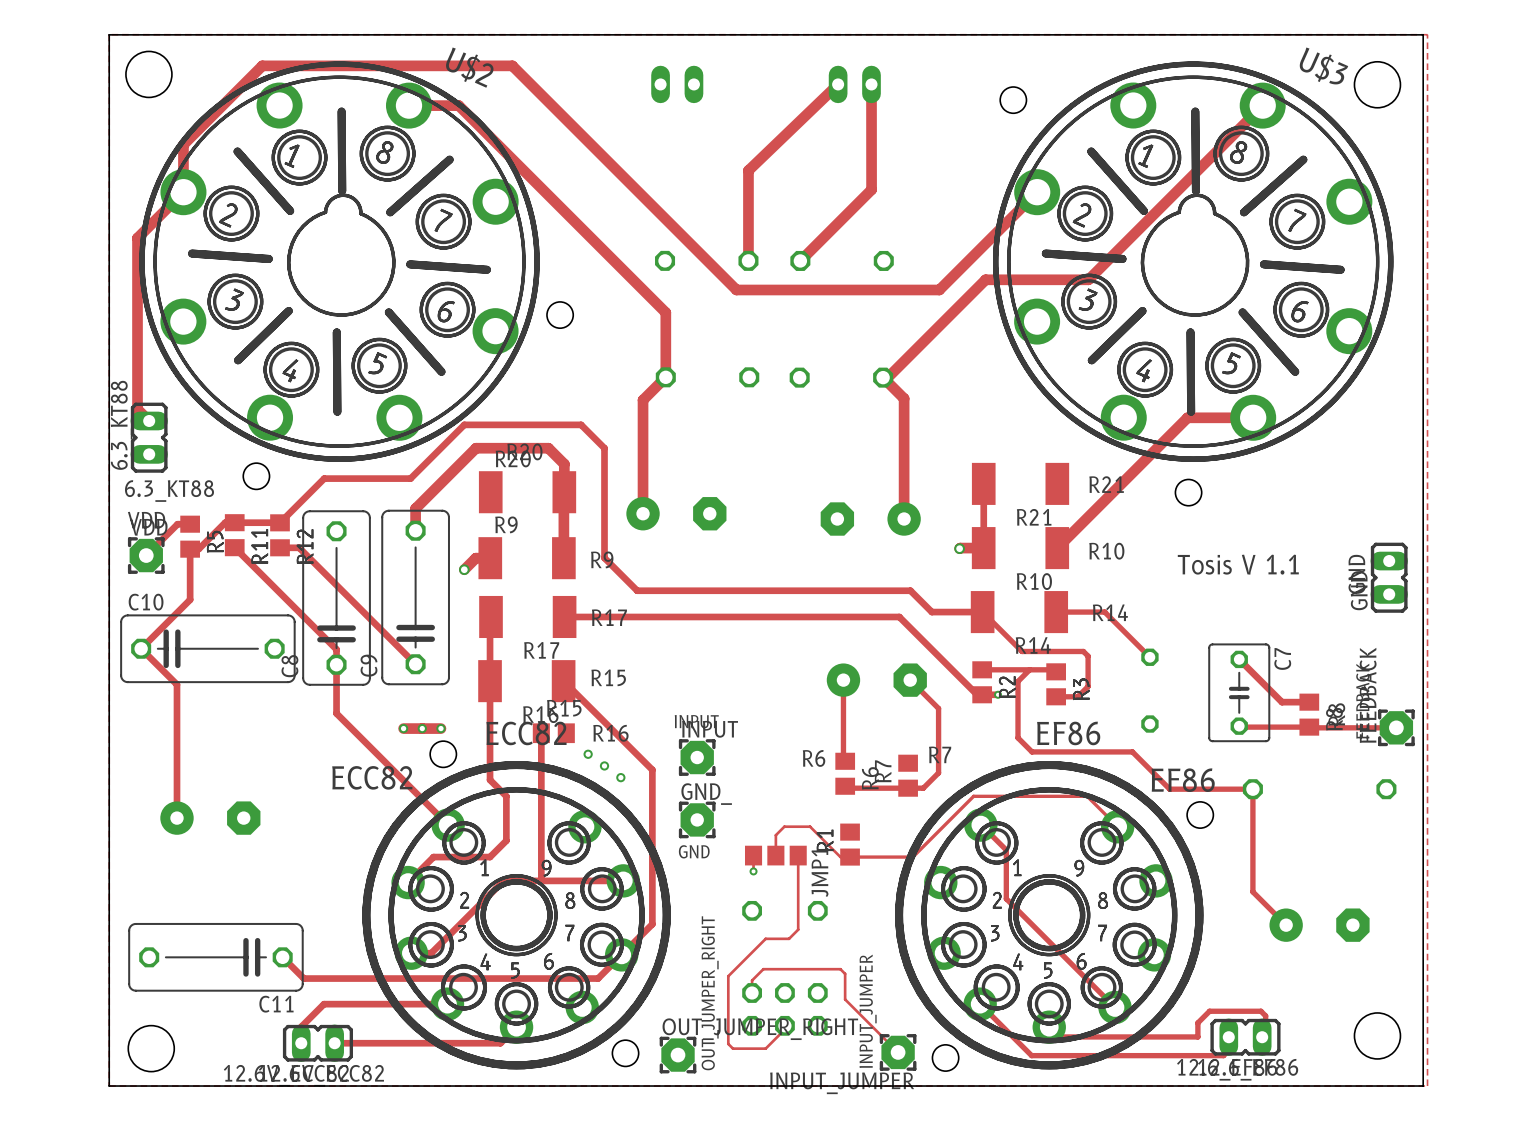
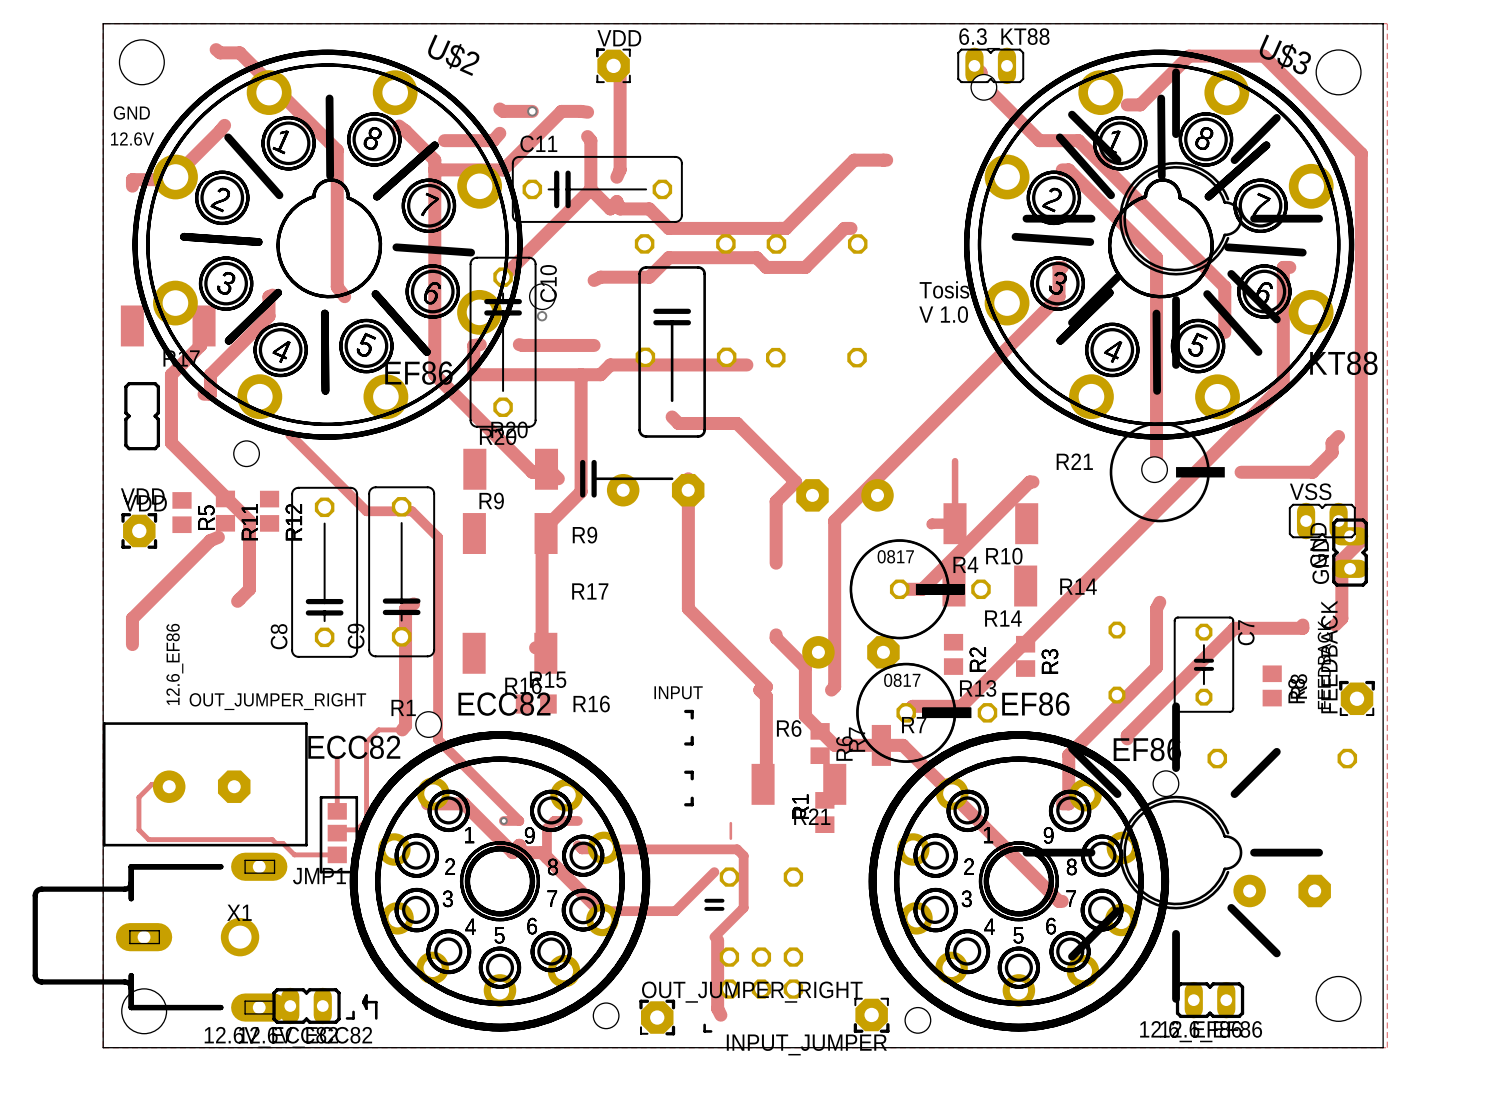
track: none -> (216, 49) (220, 52) (239, 52) (268, 82) (274, 90) (278, 91) (337, 150) (337, 286) (344, 296)
line: none -> (603, 49) (597, 49) (597, 56)
track: none -> (613, 65) (620, 72) (620, 169) (616, 177)
VDD: none -> (613, 65)
track: none -> (974, 65) (980, 72) (980, 82) (1039, 140) (1078, 140) (1224, 286) (1224, 332)
part: (677, 84) -> none
track: (838, 84) (748, 170) (748, 260) -> none
part: (854, 84) -> none
track: (871, 84) (871, 189) (800, 260) -> none
line: none -> (1176, 72) (1176, 134)
track: (408, 105) (458, 105) (665, 312) (665, 377) (643, 400) (643, 513) -> none
track: (1262, 105) (1088, 279) (985, 279) (887, 377) (883, 377) (904, 398) (904, 519) -> none
line: (341, 111) (342, 190) -> none
line: (1195, 111) (1195, 190) -> none
track: none -> (1127, 104) (1140, 104) (1189, 56) (1263, 56) (1361, 153) (1361, 540) (1341, 560) (1341, 618) (1335, 625)
track: none -> (499, 108) (503, 111) (532, 111)
via: none -> (532, 111)
track: none -> (587, 112) (561, 111) (503, 169) (434, 169)
text: none -> GND (131, 113)
line: none -> (1072, 114) (1117, 160)
line: none -> (1276, 117) (1234, 160)
track: none -> (224, 125) (171, 179) (132, 179) (132, 186)
track: none -> (399, 126) (434, 160) (434, 374) (532, 472) (551, 472) (558, 478)
track: none -> (499, 133) (493, 140) (444, 140)
track: none -> (587, 136) (590, 140) (590, 189)
line: (237, 151) (290, 210) -> none
line: (1091, 151) (1143, 210) -> none
text: none -> 12.6V (132, 139)
track: none -> (886, 160) (854, 160) (785, 228) (668, 228) (649, 208) (620, 208) (616, 201) (610, 208) (590, 189)
track: none -> (1062, 169) (1068, 169) (1156, 257) (1156, 472) (1159, 472)
track: (1037, 192) (939, 289) (736, 289) (512, 65) (262, 65) (183, 144) (183, 192) (137, 238) (137, 409) (149, 420) -> none
track: none -> (590, 189) (503, 277)
line: none -> (1228, 199) (1217, 181) (1201, 169) (1182, 163) (1162, 164) (1144, 172) (1134, 181) (1124, 198) (1120, 218) (1124, 238) (1134, 255) (1144, 264) (1162, 272) (1182, 273) (1201, 267) (1217, 255) (1228, 238)
line: none -> (1224, 202) (1232, 204) (1238, 210) (1241, 218) (1239, 224) (1232, 232) (1224, 234) (1219, 246) (1210, 256) (1193, 266) (1174, 270) (1155, 265) (1139, 254) (1128, 237) (1124, 218) (1128, 199) (1134, 187) (1143, 178) (1161, 169) (1180, 167) (1199, 173) (1215, 185) (1224, 202)
line: none -> (1026, 218) (1091, 218)
line: none -> (1254, 218) (1319, 218)
track: none -> (851, 228) (844, 228) (805, 267) (766, 267) (756, 257) (668, 257) (649, 277) (600, 277) (594, 280)
line: (1045, 253) (1122, 258) -> none
line: (410, 264) (486, 269) -> none
line: (1263, 264) (1340, 269) -> none
line: none -> (646, 267) (698, 267) (704, 272) (704, 429) (699, 436) (645, 436) (639, 431) (639, 273) (641, 269) (646, 267)
track: none -> (1062, 267) (1058, 267) (1058, 296) (834, 521) (834, 686) (831, 690)
track: none -> (1289, 267) (1283, 267) (1283, 384) (961, 706) (912, 706) (906, 712)
line: none -> (1231, 273) (1276, 319)
line: none -> (1117, 277) (1072, 322)
text: none -> Tosis (944, 289)
line: (1242, 312) (1295, 371) -> none
track: none -> (272, 295) (268, 296) (268, 316) (210, 374) (210, 394) (204, 394)
line: none -> (1176, 299) (1176, 364)
line: none -> (655, 311) (688, 311)
line: (1190, 332) (1191, 411) -> none
text: none -> V 1.0 (943, 314)
via: none -> (542, 316)
line: none -> (655, 322) (688, 322)
line: none -> (672, 322) (672, 400)
track: none -> (204, 325) (200, 325) (200, 345) (171, 374) (171, 443) (249, 521) (249, 589) (237, 601)
track: none -> (480, 344) (473, 345) (473, 374) (600, 374) (610, 364) (746, 364)
track: none -> (519, 344) (594, 345)
text: none -> KT88 (1343, 363)
text: none -> EF86 (418, 373)
track: none -> (581, 374) (581, 491) (542, 530) (542, 647) (535, 647)
track: (1253, 417) (1187, 417) (1057, 548) -> none
6.3_KT88 rotation: 0° (149, 437) -> 90° clockwise (990, 65)
6.3_KT88 position: (149, 437) -> (990, 65)
track: none -> (672, 416) (678, 423) (737, 423) (795, 482) (776, 501) (776, 563)
drawing: none -> [1109, 422, 1225, 523]
track: none -> (290, 434) (366, 511) (412, 511) (438, 537) (438, 739) (519, 820) (503, 820)
track: none -> (1338, 436) (1332, 443) (1332, 452) (1312, 472) (1241, 472)
R21 position: (1020, 483) -> (798, 784)
line: none -> (582, 462) (582, 495)
line: none -> (594, 462) (594, 495)
text: 6.3_KT88 (169, 491) -> none
line: none -> (594, 478) (672, 478)
track: none -> (688, 478) (688, 608) (766, 686) (759, 690) (766, 696) (766, 784) (763, 784)
track: none -> (1032, 482) (1029, 482) (922, 589) (899, 589)
track: (279, 522) (225, 522) (198, 549) (190, 549) (190, 599) (141, 648) (176, 684) (176, 818) -> none
track: (280, 522) (324, 478) (410, 478) (464, 424) (581, 424) (604, 448) (604, 558) (637, 590) (910, 590) (931, 612) (982, 612) (1022, 651) (1083, 651) (1088, 656) (1088, 686) (1077, 696) (1056, 696) -> none
track: (190, 524) (177, 524) (146, 555) -> none
track: (415, 530) (415, 508) (476, 448) (548, 448) (564, 464) (563, 558) -> none
VSS: none -> (1322, 521)
track: (234, 547) (336, 649) (336, 713) (448, 825) -> none
track: (280, 547) (299, 547) (415, 664) -> none
via: (959, 548) -> none
text: R10 (1106, 551) -> none
track: (490, 558) (475, 558) (464, 569) -> none
track: none -> (218, 537) (210, 540) (132, 618) (132, 644)
drawing: none -> [849, 539, 965, 640]
text: Tosis V 1.1 (1238, 564) -> none
via: (464, 569) -> none
track: (1056, 612) (1104, 612) (1149, 657) -> none
R4: none -> (920, 589)
track: (491, 616) (490, 779) (506, 796) (506, 840) (490, 857) (433, 857) (408, 882) -> none
R17 position: (527, 616) -> (168, 325)
track: (564, 616) (899, 616) (977, 694) (998, 694) -> none
track: none -> (1159, 602) (1156, 608) (1156, 667) (1068, 755) (1068, 803) (1062, 803)
track: none -> (413, 603) (405, 608) (405, 725) (402, 729) (378, 729) (366, 742) (366, 820) (356, 829) (340, 829) (337, 833)
C10 rotation: 0° (207, 648) -> 90° clockwise (503, 342)
C10 position: (207, 648) -> (503, 342)
track: none -> (1302, 625) (1302, 628) (1234, 628) (1127, 735) (1127, 738)
track: (1239, 659) (1281, 702) (1309, 702) -> none
track: none -> (776, 634) (776, 638) (805, 667) (805, 716) (834, 745) (902, 745) (1058, 901) (1062, 901)
track: (982, 669) (1054, 669) (1056, 671) -> none
track: (1029, 669) (1018, 681) (1018, 737) (1032, 751) (1132, 751) (1169, 789) (1252, 789) (1252, 891) (1286, 925) -> none
text: R15 (608, 677) -> none
track: (843, 680) (843, 759) (845, 761) -> none
track: (910, 680) (938, 708) (938, 772) (923, 788) (847, 788) (845, 786) -> none
track: (563, 681) (652, 769) (652, 924) (598, 978) (303, 978) (282, 957) -> none
drawing: none -> [856, 662, 972, 763]
text: none -> 12.6_EF86 (174, 664)
via: (998, 694) -> none
track: (1239, 726) (1396, 727) -> none
track: (403, 728) (440, 728) -> none
via: (403, 728) -> none
via: (422, 728) -> none
via: (440, 728) -> none
text: none -> OUT_JUMPER_RIGHT (277, 701)
track: (541, 733) (541, 880) -> none
line: none -> (1176, 706) (1176, 768)
text: none -> R1 (403, 707)
line: (1379, 737) (1379, 744) (1386, 744) -> none
line: (1413, 737) (1413, 744) (1406, 744) -> none
line: (687, 740) (680, 740) (680, 747) -> none
R13: none -> (926, 712)
line: none -> (104, 723) (104, 845) (306, 845) (306, 723) (104, 723)
via: (588, 754) -> none
INPUT: (697, 757) -> none
via: (604, 765) -> none
line: (680, 767) (680, 774) (687, 774) -> none
via: (620, 777) -> none
line: none -> (1072, 748) (1117, 794)
line: none -> (1276, 751) (1234, 794)
track: none -> (337, 758) (337, 811)
line: (687, 803) (680, 803) (680, 809) -> none
track: none -> (168, 784) (151, 784) (138, 797) (138, 829) (148, 839) (272, 839) (276, 843) (282, 843) (294, 854) (337, 854)
GND_: (697, 819) -> none
track: (980, 825) (1006, 850) (1006, 898) (1115, 1007) -> none
track: (1117, 826) (1087, 796) (973, 796) (912, 857) (840, 857) (810, 826) (784, 826) (775, 835) (775, 855) -> none
line: none -> (321, 797) (356, 797) (356, 872) (321, 872) (321, 797)
line: (680, 829) (680, 836) (687, 836) -> none
track: none -> (427, 803) (464, 803) (512, 852) (519, 845) (522, 852) (542, 852) (600, 911) (675, 911) (714, 872)
text: GND (694, 851) -> none
via: none -> (503, 820)
track: none -> (577, 820) (554, 820) (546, 828) (546, 857)
JMP1 rotation: 0° (775, 855) -> 90° clockwise (337, 833)
JMP1 position: (775, 855) -> (337, 833)
track: (798, 855) (798, 929) (789, 938) (765, 938) (728, 976) (728, 1043) (732, 1048) (765, 1048) (784, 1029) (784, 1025) -> none
line: none -> (1228, 833) (1217, 815) (1201, 803) (1182, 797) (1162, 798) (1144, 806) (1134, 815) (1124, 832) (1120, 852) (1124, 872) (1134, 889) (1144, 898) (1162, 906) (1182, 907) (1201, 901) (1217, 889) (1228, 872)
line: none -> (1224, 836) (1232, 838) (1238, 844) (1241, 852) (1239, 858) (1232, 866) (1224, 868) (1219, 880) (1210, 890) (1193, 900) (1174, 904) (1155, 899) (1139, 888) (1128, 871) (1124, 852) (1128, 833) (1134, 821) (1143, 812) (1161, 803) (1180, 801) (1199, 807) (1215, 819) (1224, 836)
via: (753, 871) -> none
track: none -> (577, 845) (581, 849) (737, 849) (743, 855) (743, 907) (714, 937)
track: (623, 880) (503, 880) (431, 953) (411, 953) -> none
line: none -> (1026, 852) (1091, 852)
line: none -> (1254, 852) (1319, 852)
line: none -> (220, 866) (131, 866) (131, 898)
line: none -> (706, 900) (722, 900)
line: none -> (1231, 907) (1276, 953)
line: none -> (706, 908) (722, 908)
line: none -> (1117, 911) (1072, 956)
C11 rotation: 0° (215, 957) -> 180° (597, 189)
C11 position: (215, 957) -> (597, 189)
line: none -> (1176, 933) (1176, 998)
X1: none -> (160, 937)
track: none -> (717, 940) (717, 1008) (720, 1015)
track: (752, 992) (752, 980) (763, 969) (840, 969) (845, 973) (845, 999) (898, 1052) -> none
text: OUT_JUMPER_RIGHT (710, 993) -> none
track: (447, 1004) (323, 1004) (301, 1026) (301, 1043) -> none
track: (980, 1004) (1031, 1055) (1223, 1055) (1228, 1050) (1228, 1037) -> none
line: none -> (131, 975) (131, 1007) (220, 1007)
text: INPUT_JUMPER (868, 1011) -> none
track: (516, 1027) (500, 1043) (334, 1043) -> none
track: (1049, 1027) (1059, 1036) (1197, 1036) (1197, 1022) (1209, 1011) (1260, 1011) (1265, 1015) (1265, 1033) (1262, 1037) -> none
line: (888, 1035) (881, 1035) (881, 1042) -> none
line: (908, 1035) (914, 1035) (914, 1042) -> none
line: none -> (363, 1002) (376, 1002) (376, 1018)
line: none -> (363, 1002) (366, 995) (366, 1008) (363, 1002)
line: none -> (353, 1011) (353, 1018) (347, 1018)
line: (661, 1065) (661, 1071) (667, 1071) -> (704, 1024) (704, 1031) (711, 1031)

